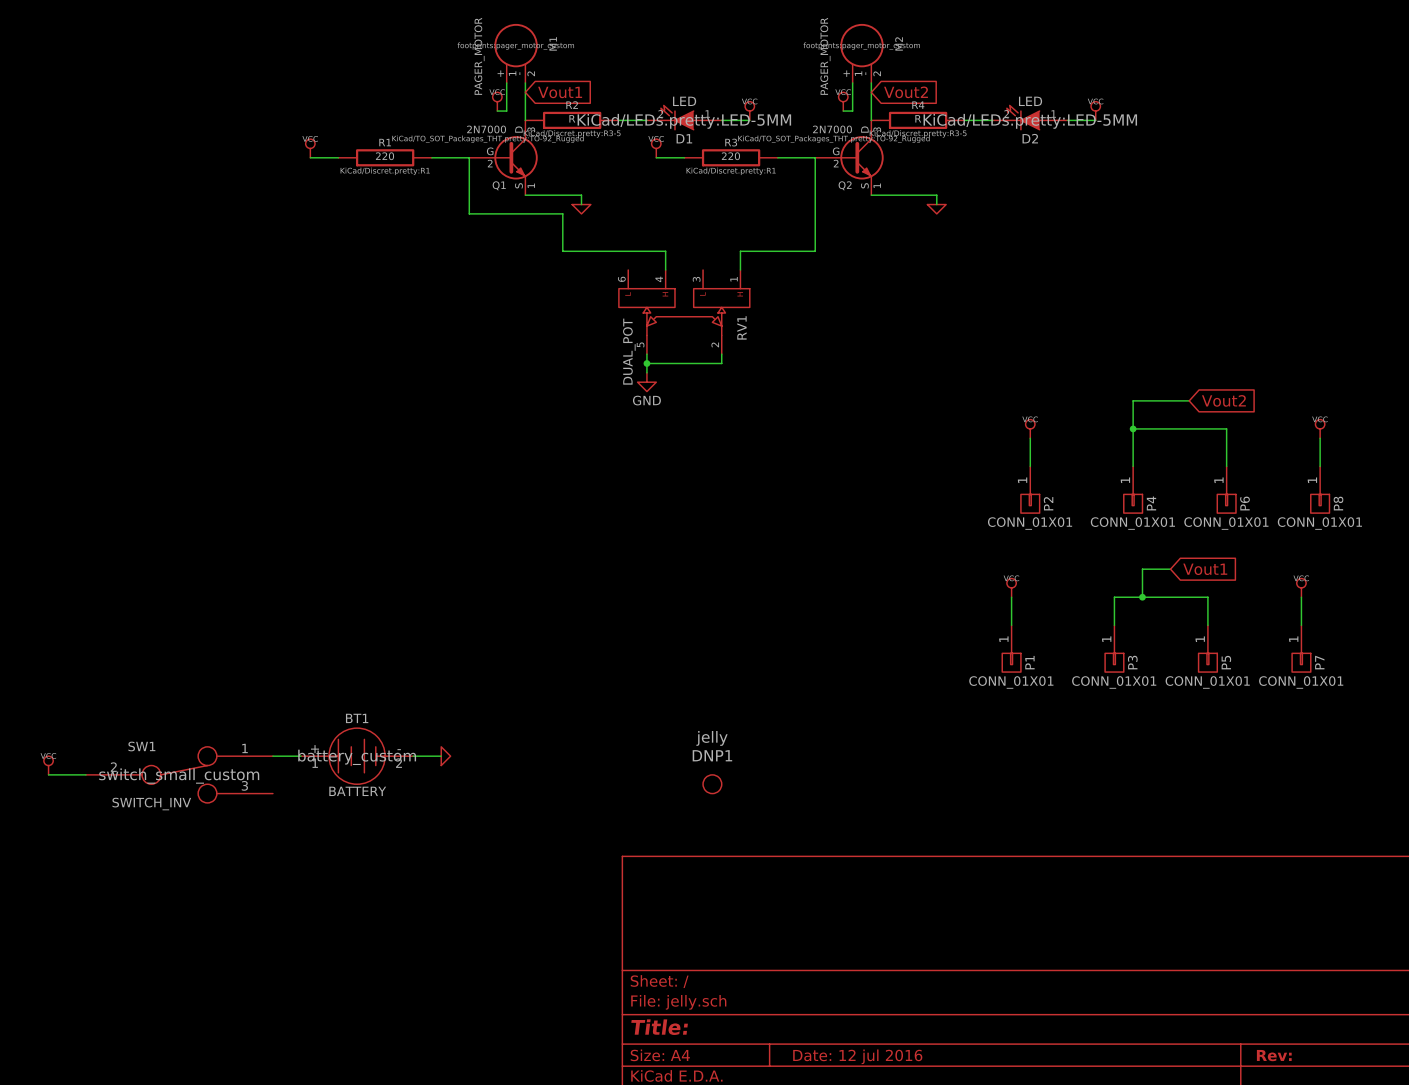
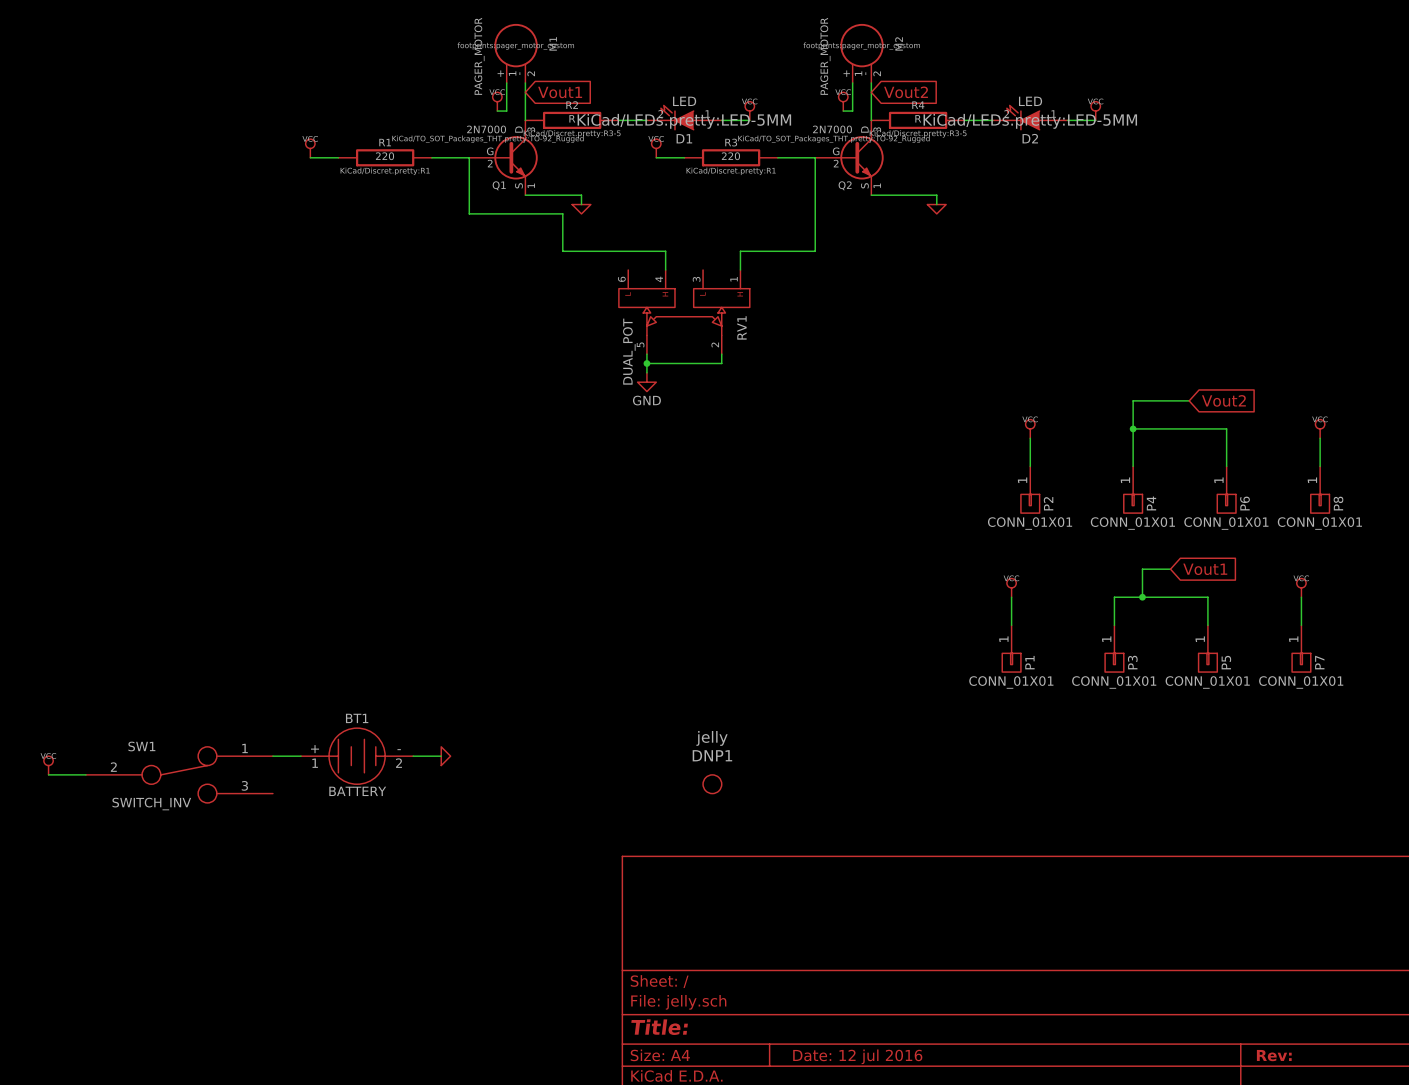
BT1 text: battery_custom (357, 757) -> none
SW1 text: switch_small_custom (179, 776) -> none

